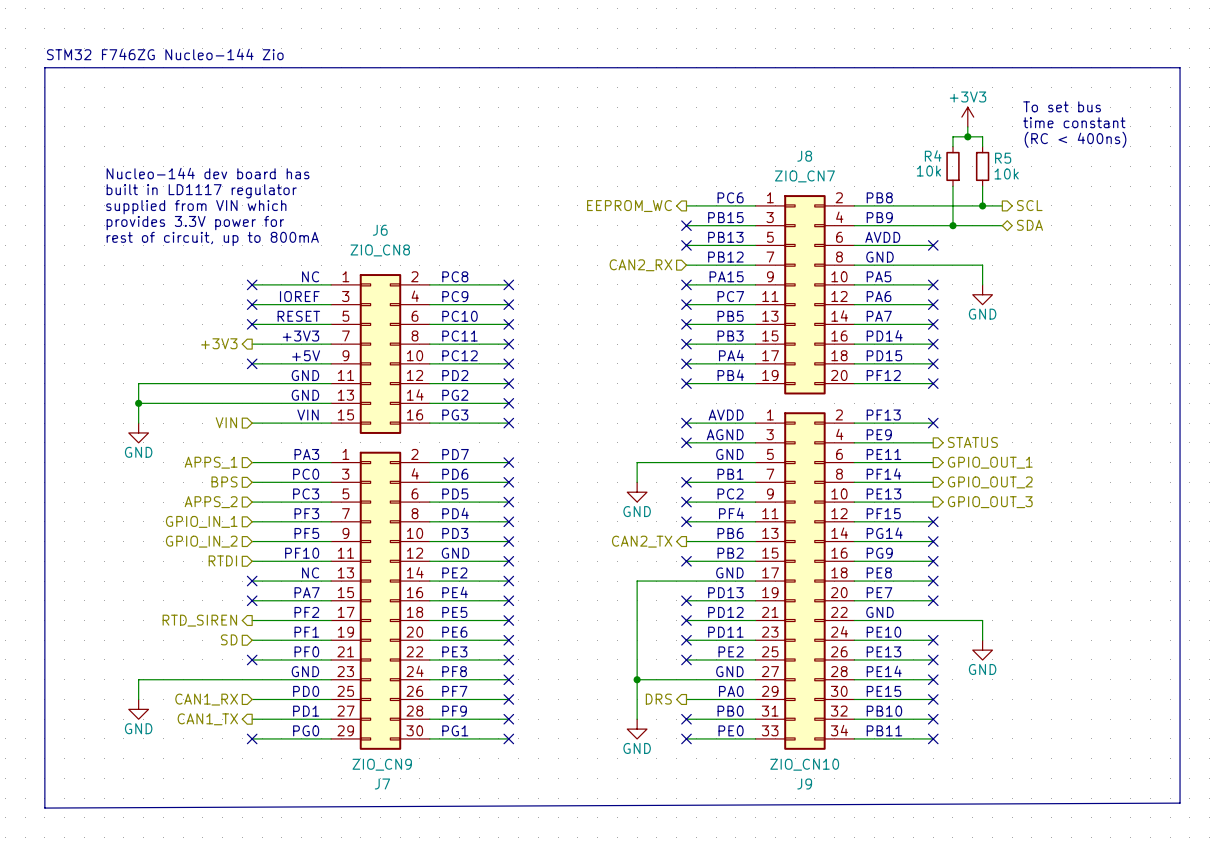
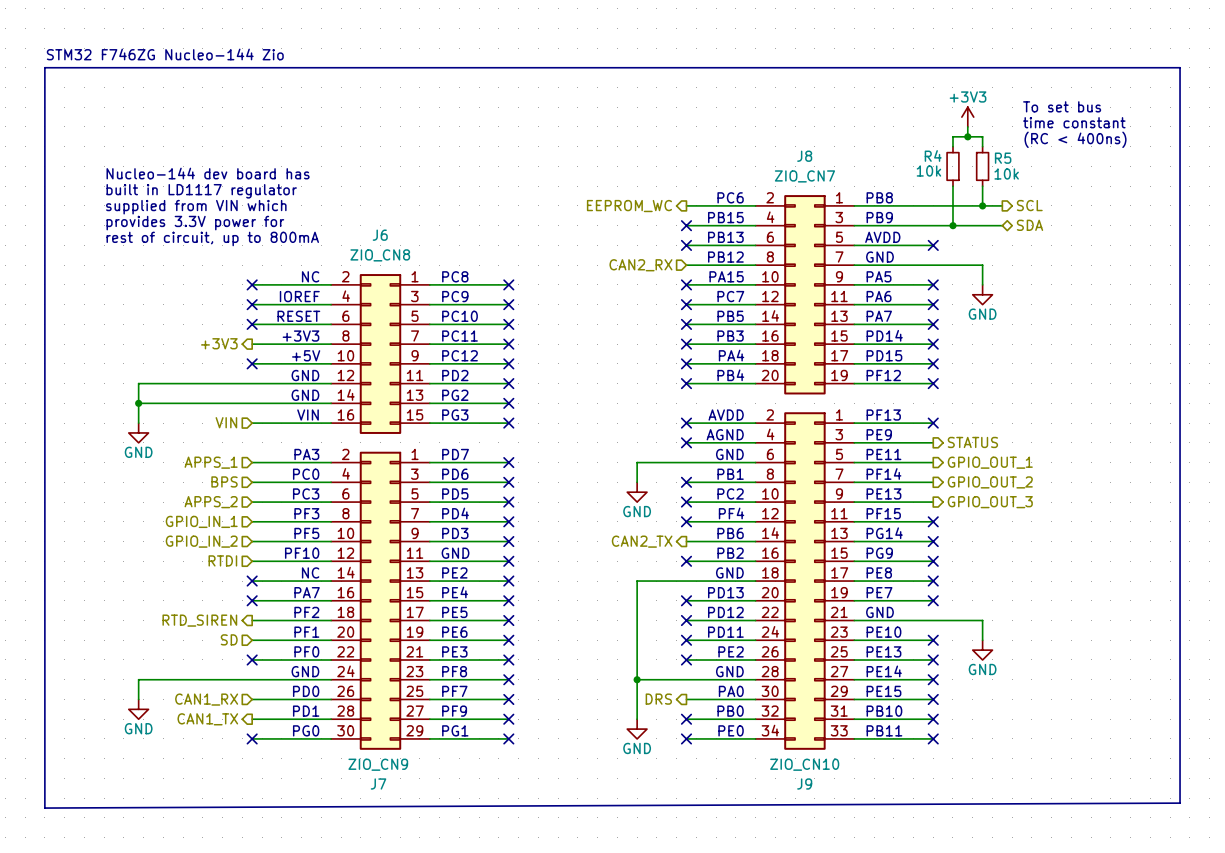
J8 flip: as is (804, 294) -> left-right (804, 294)
J6 flip: as is (380, 354) -> left-right (380, 354)
J9 flip: as is (804, 581) -> left-right (804, 581)
J7 flip: as is (380, 600) -> left-right (380, 600)

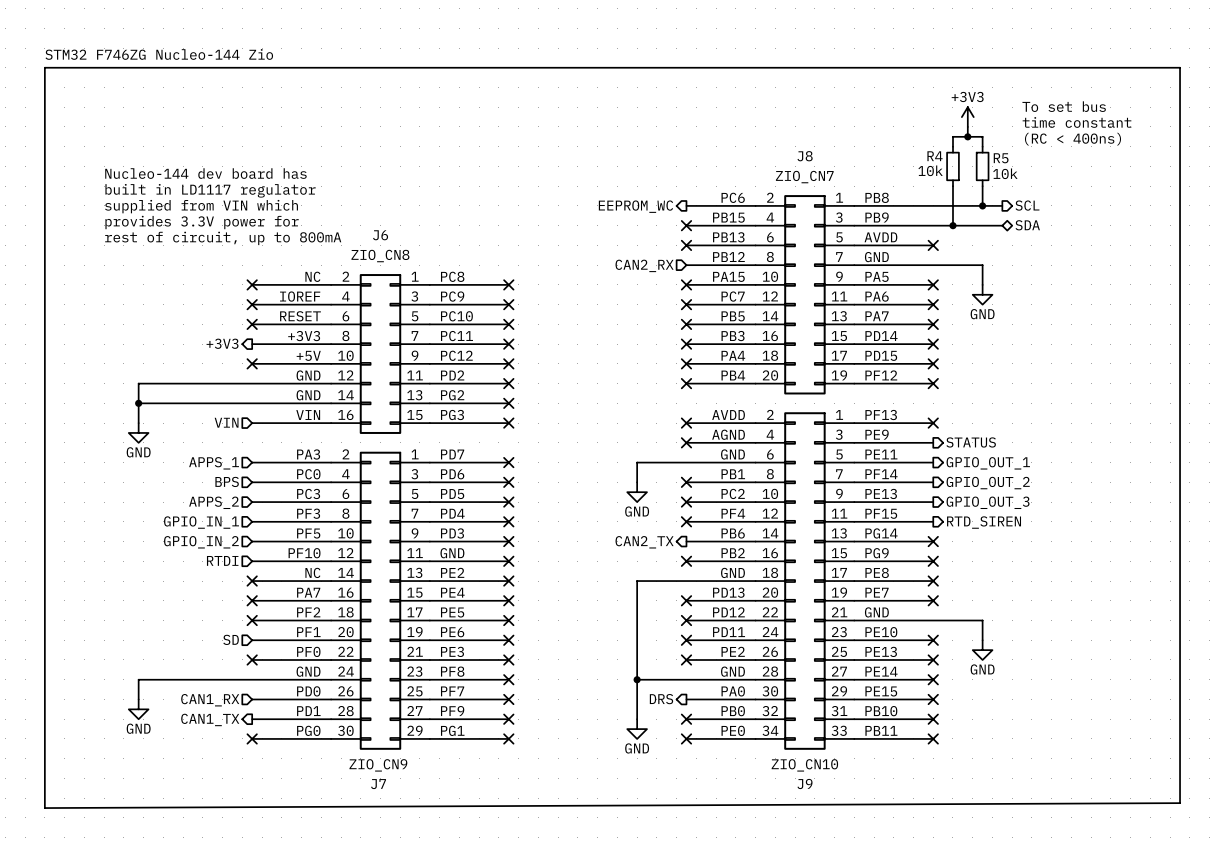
no-connect mark: (933, 521) -> none
hierarchical label: none -> RTD_SIREN (984, 522)
hierarchical label: RTD_SIREN (199, 620) -> none
no-connect mark: none -> (252, 620)

